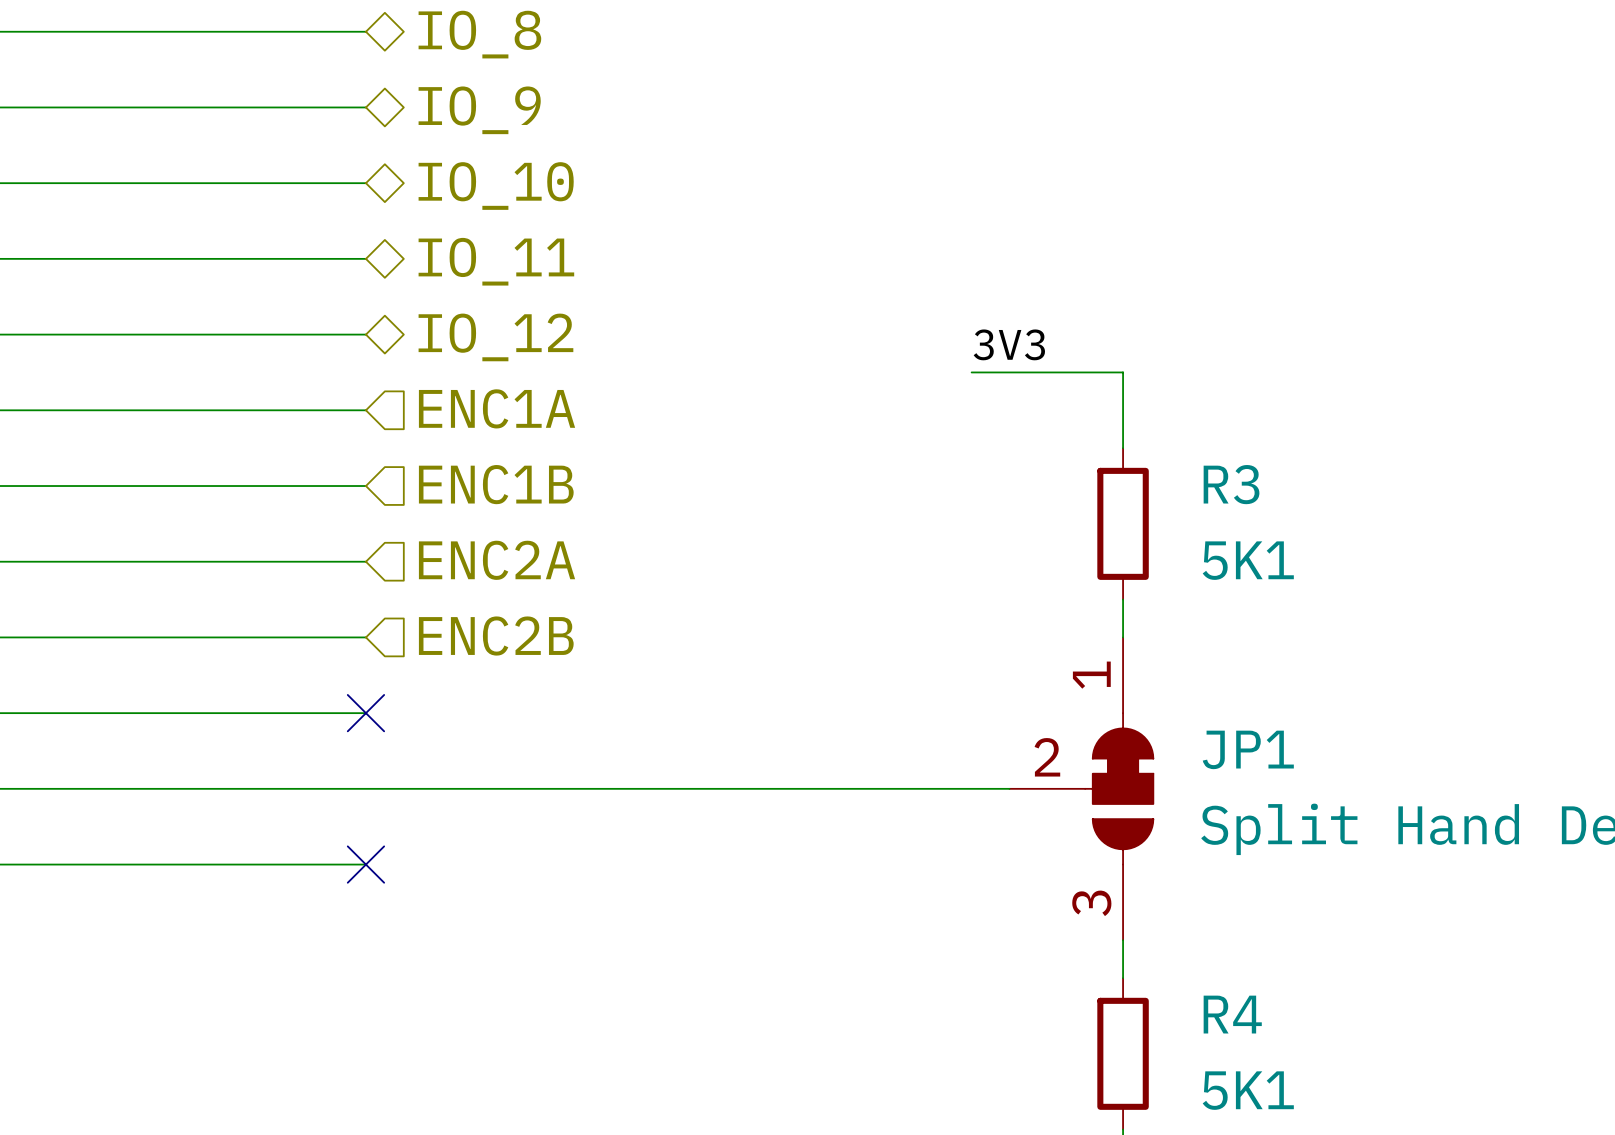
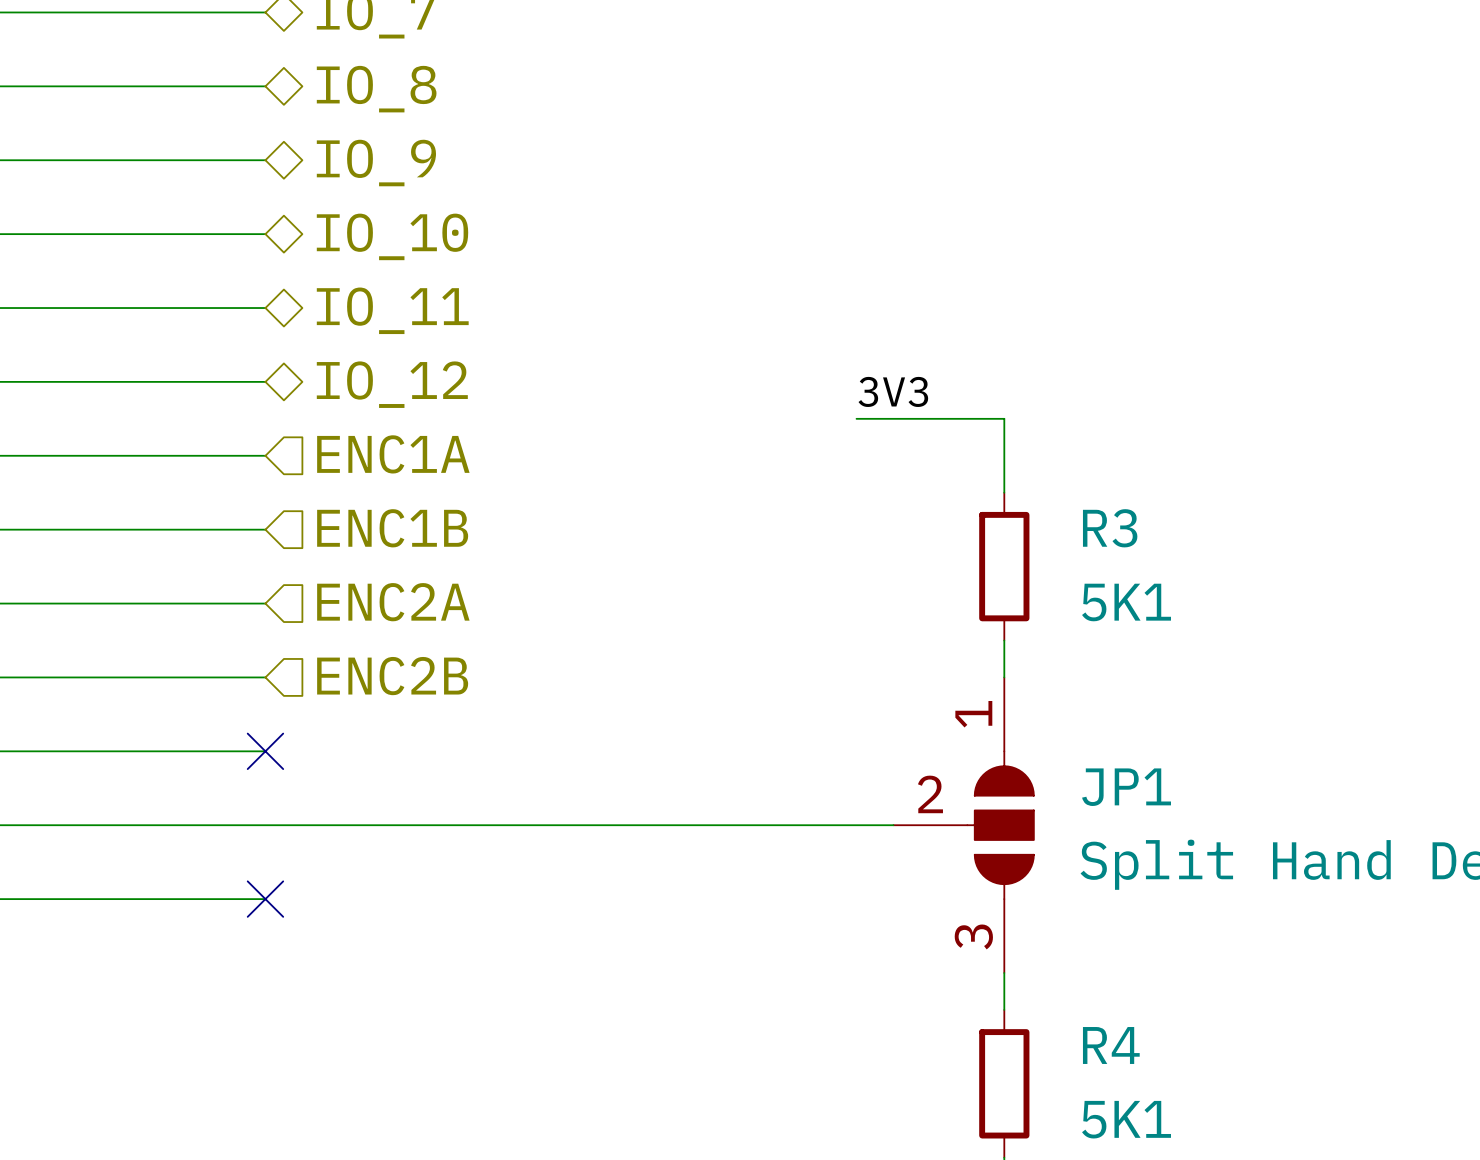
JP1 symbol: [1009, 637, 1154, 941] -> [893, 677, 1034, 973]

